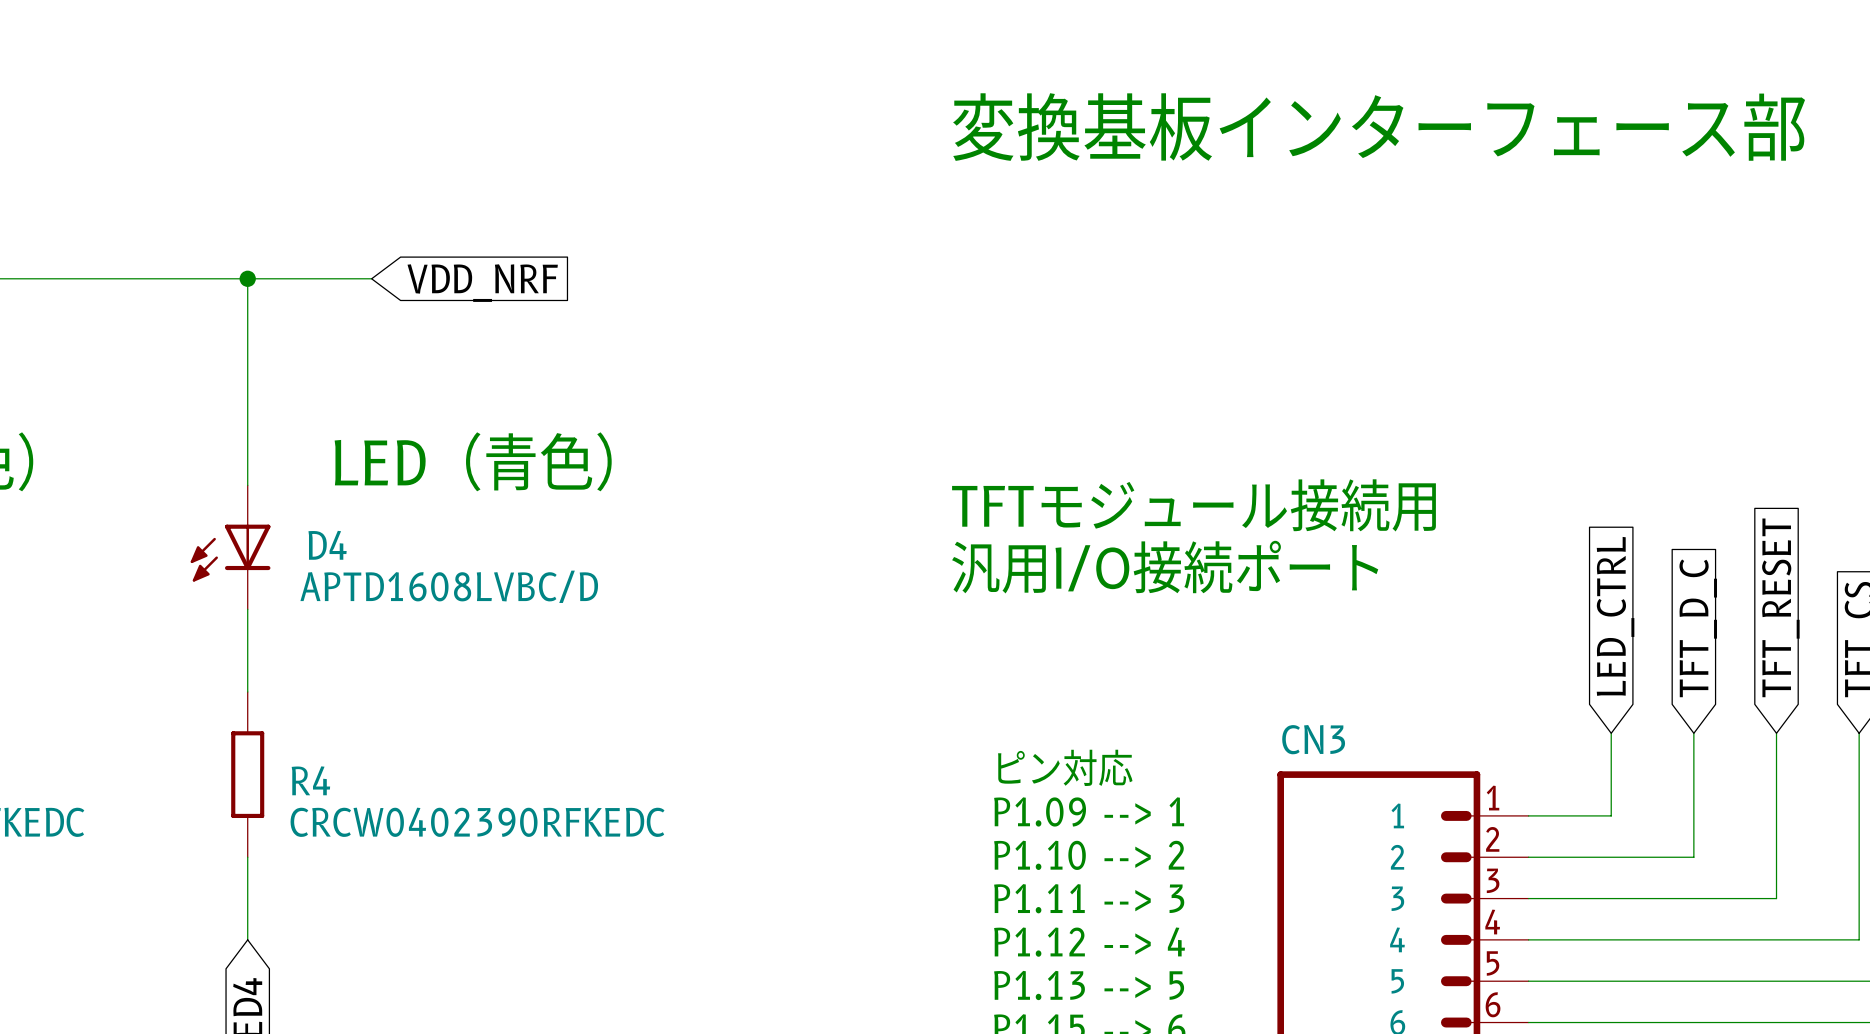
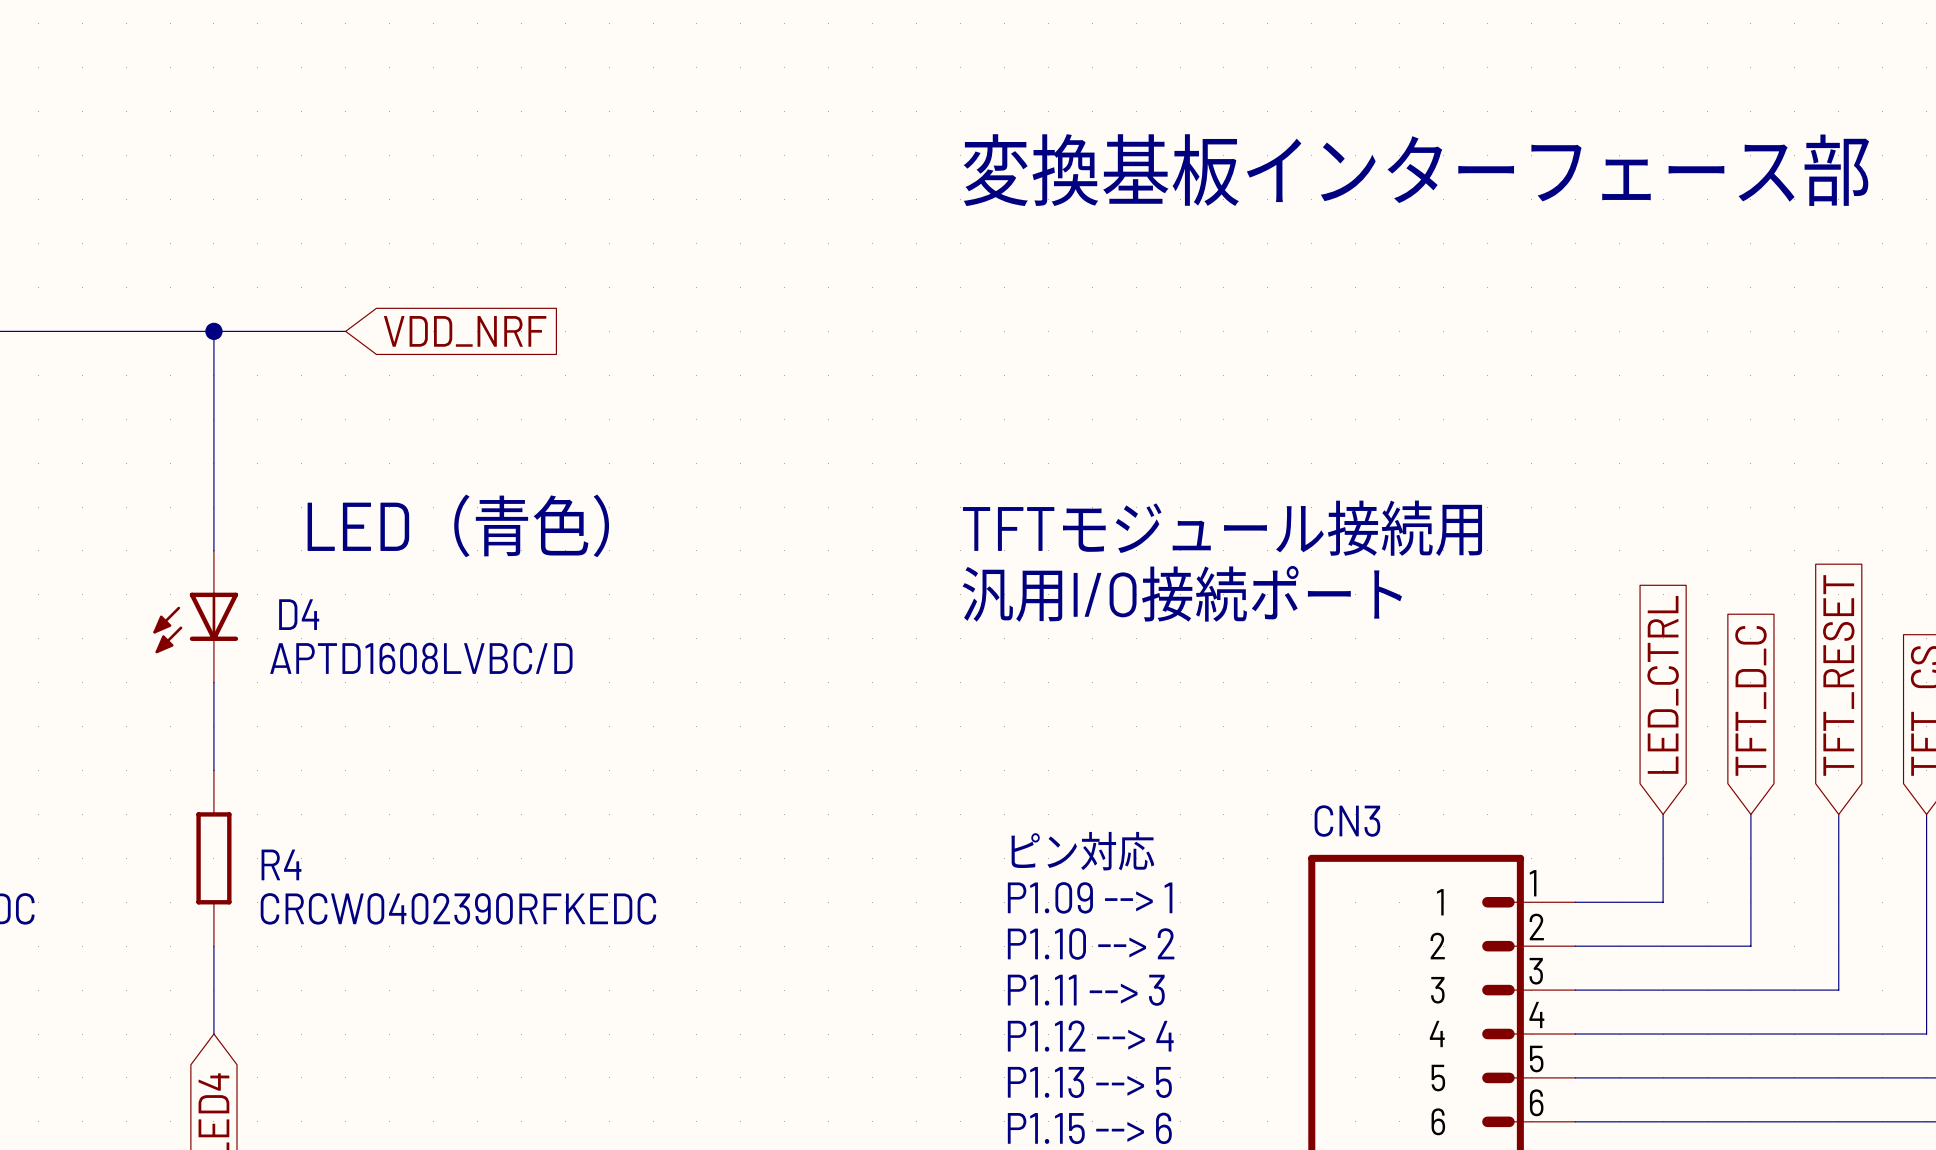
text position: TFTモジュール接続用 (1194, 505) -> TFTモジュール接続用 (1222, 528)
text position: 汎用I/O接続ポート (1165, 567) -> 汎用I/O接続ポート (1182, 593)

